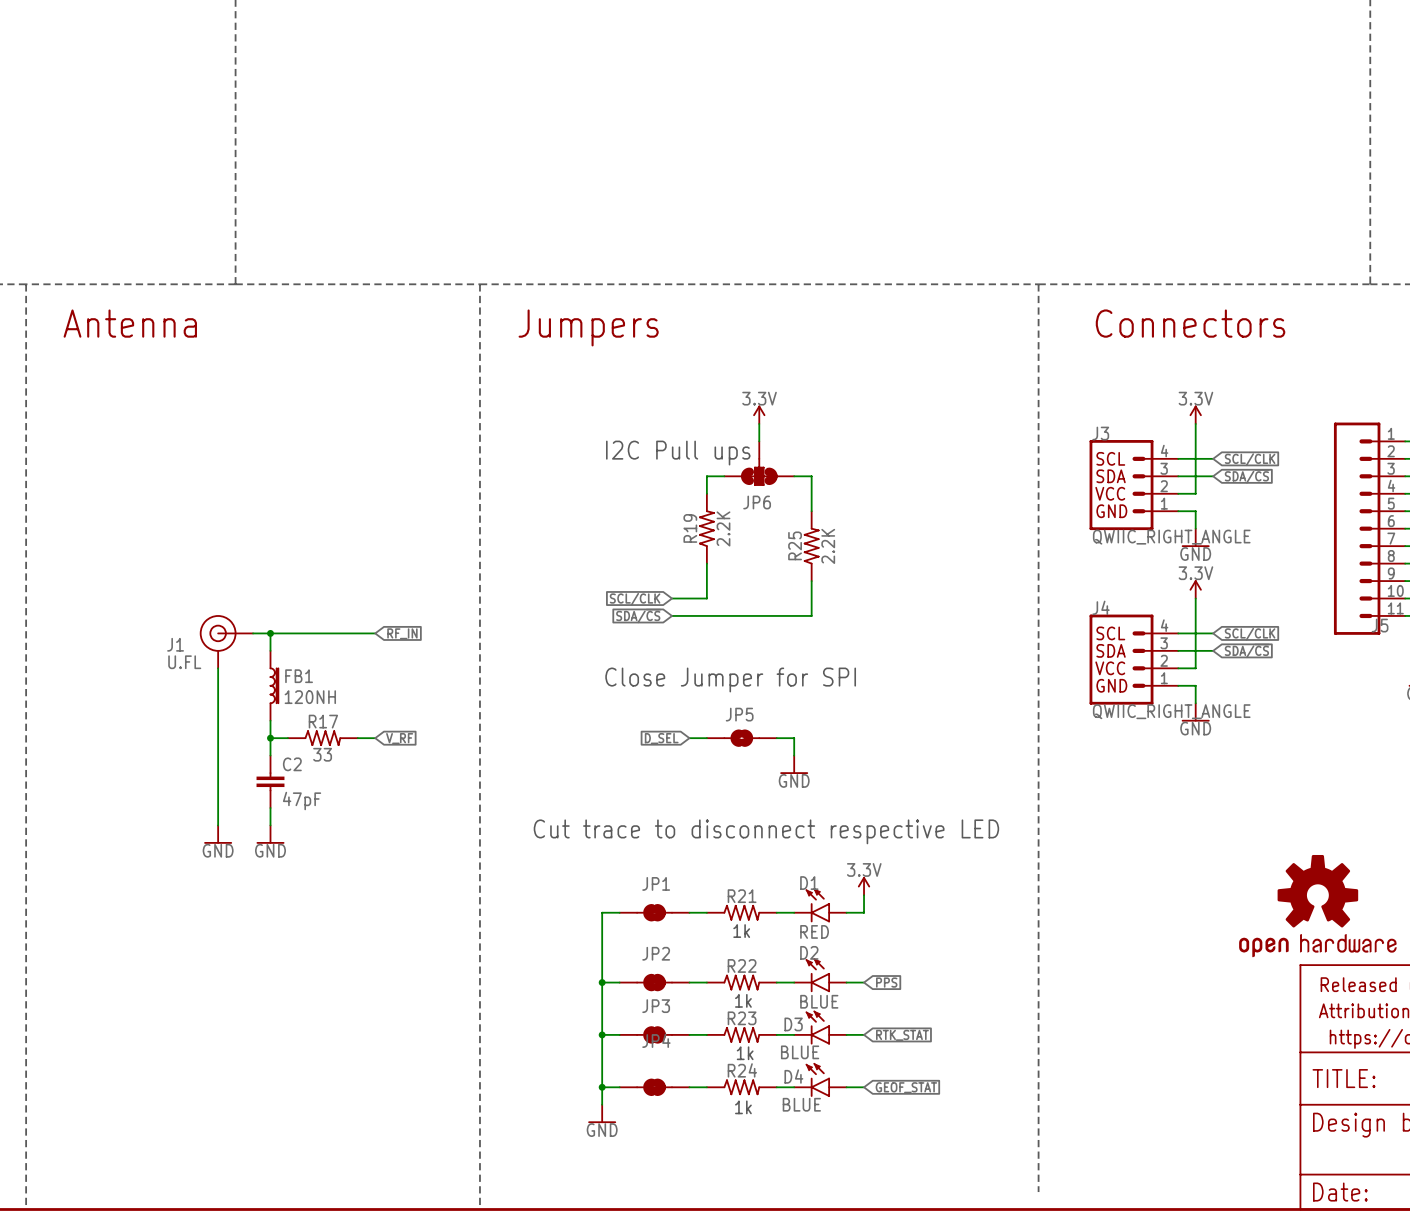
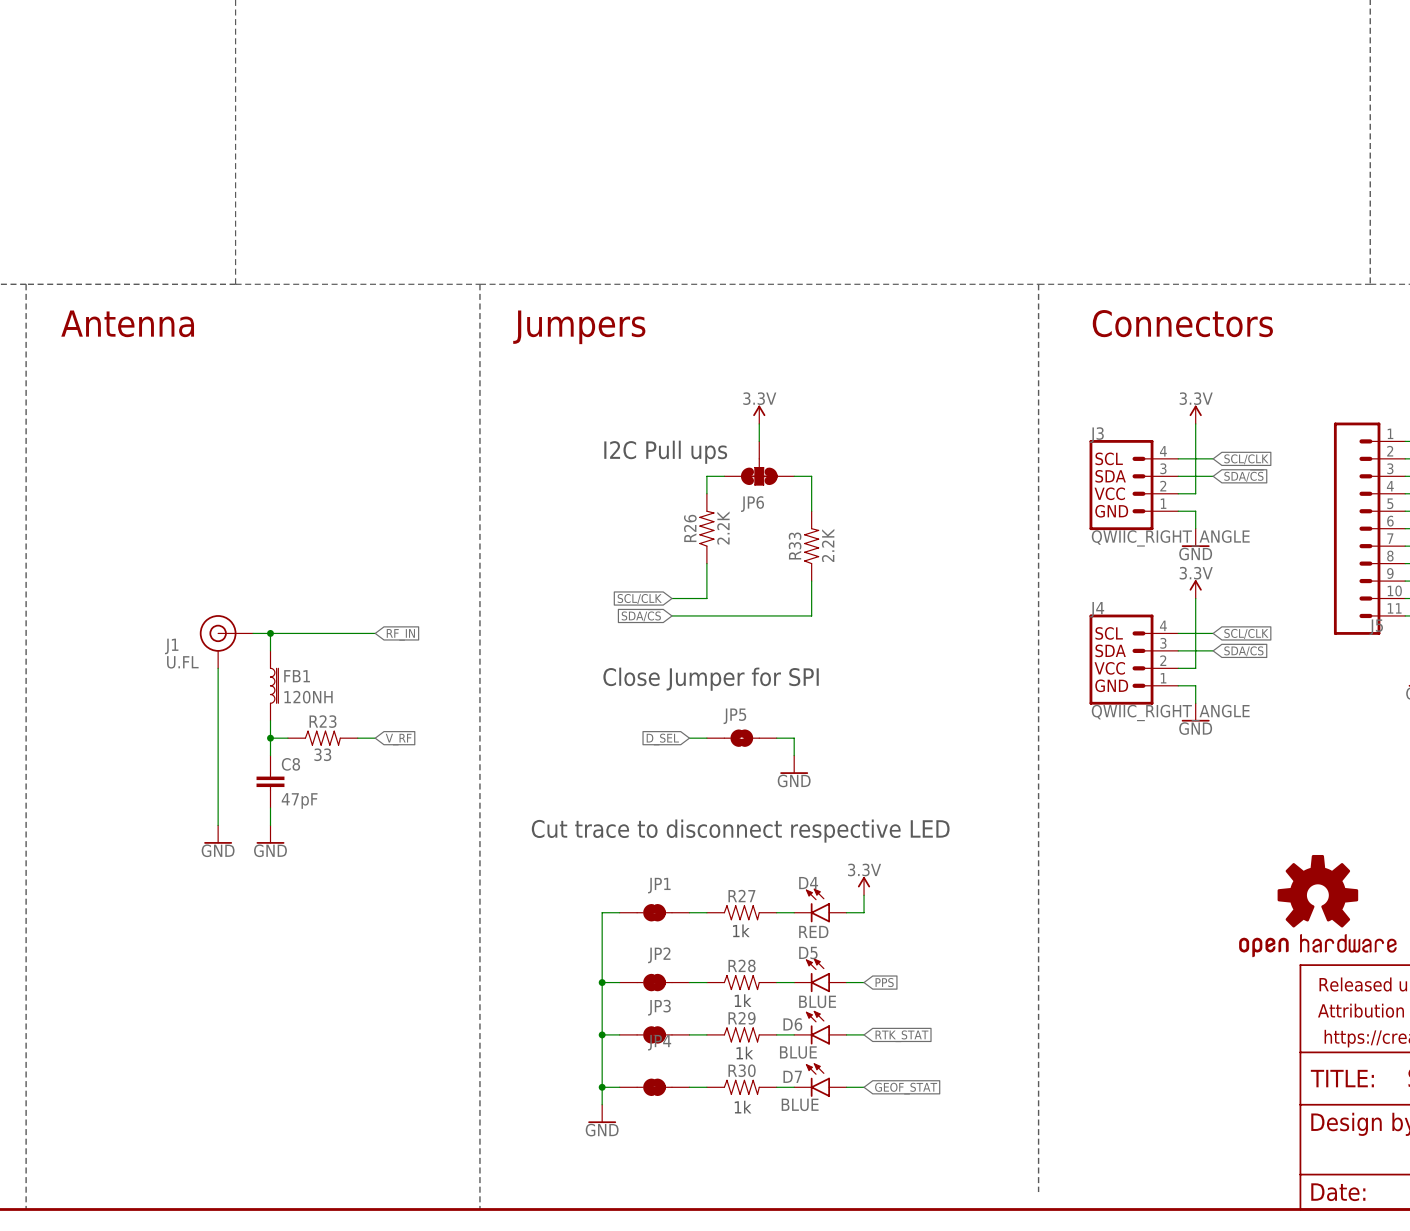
R19 name: R19 (690, 528) -> R26 (690, 528)
R25 name: R25 (795, 545) -> R33 (795, 546)
R17 name: R17 (323, 721) -> R23 (323, 721)
C2 name: C2 (292, 764) -> C8 (290, 764)
D1 name: D1 (809, 883) -> D4 (808, 883)
R21 name: R21 (742, 896) -> R27 (741, 896)
D2 name: D2 (809, 952) -> D5 (808, 953)
R22 name: R22 (742, 965) -> R28 (742, 965)
R23 name: R23 (742, 1018) -> R29 (742, 1018)
D3 name: D3 (793, 1024) -> D6 (792, 1024)
R24 name: R24 (742, 1070) -> R30 (742, 1070)
D4 name: D4 (793, 1076) -> D7 (792, 1076)

